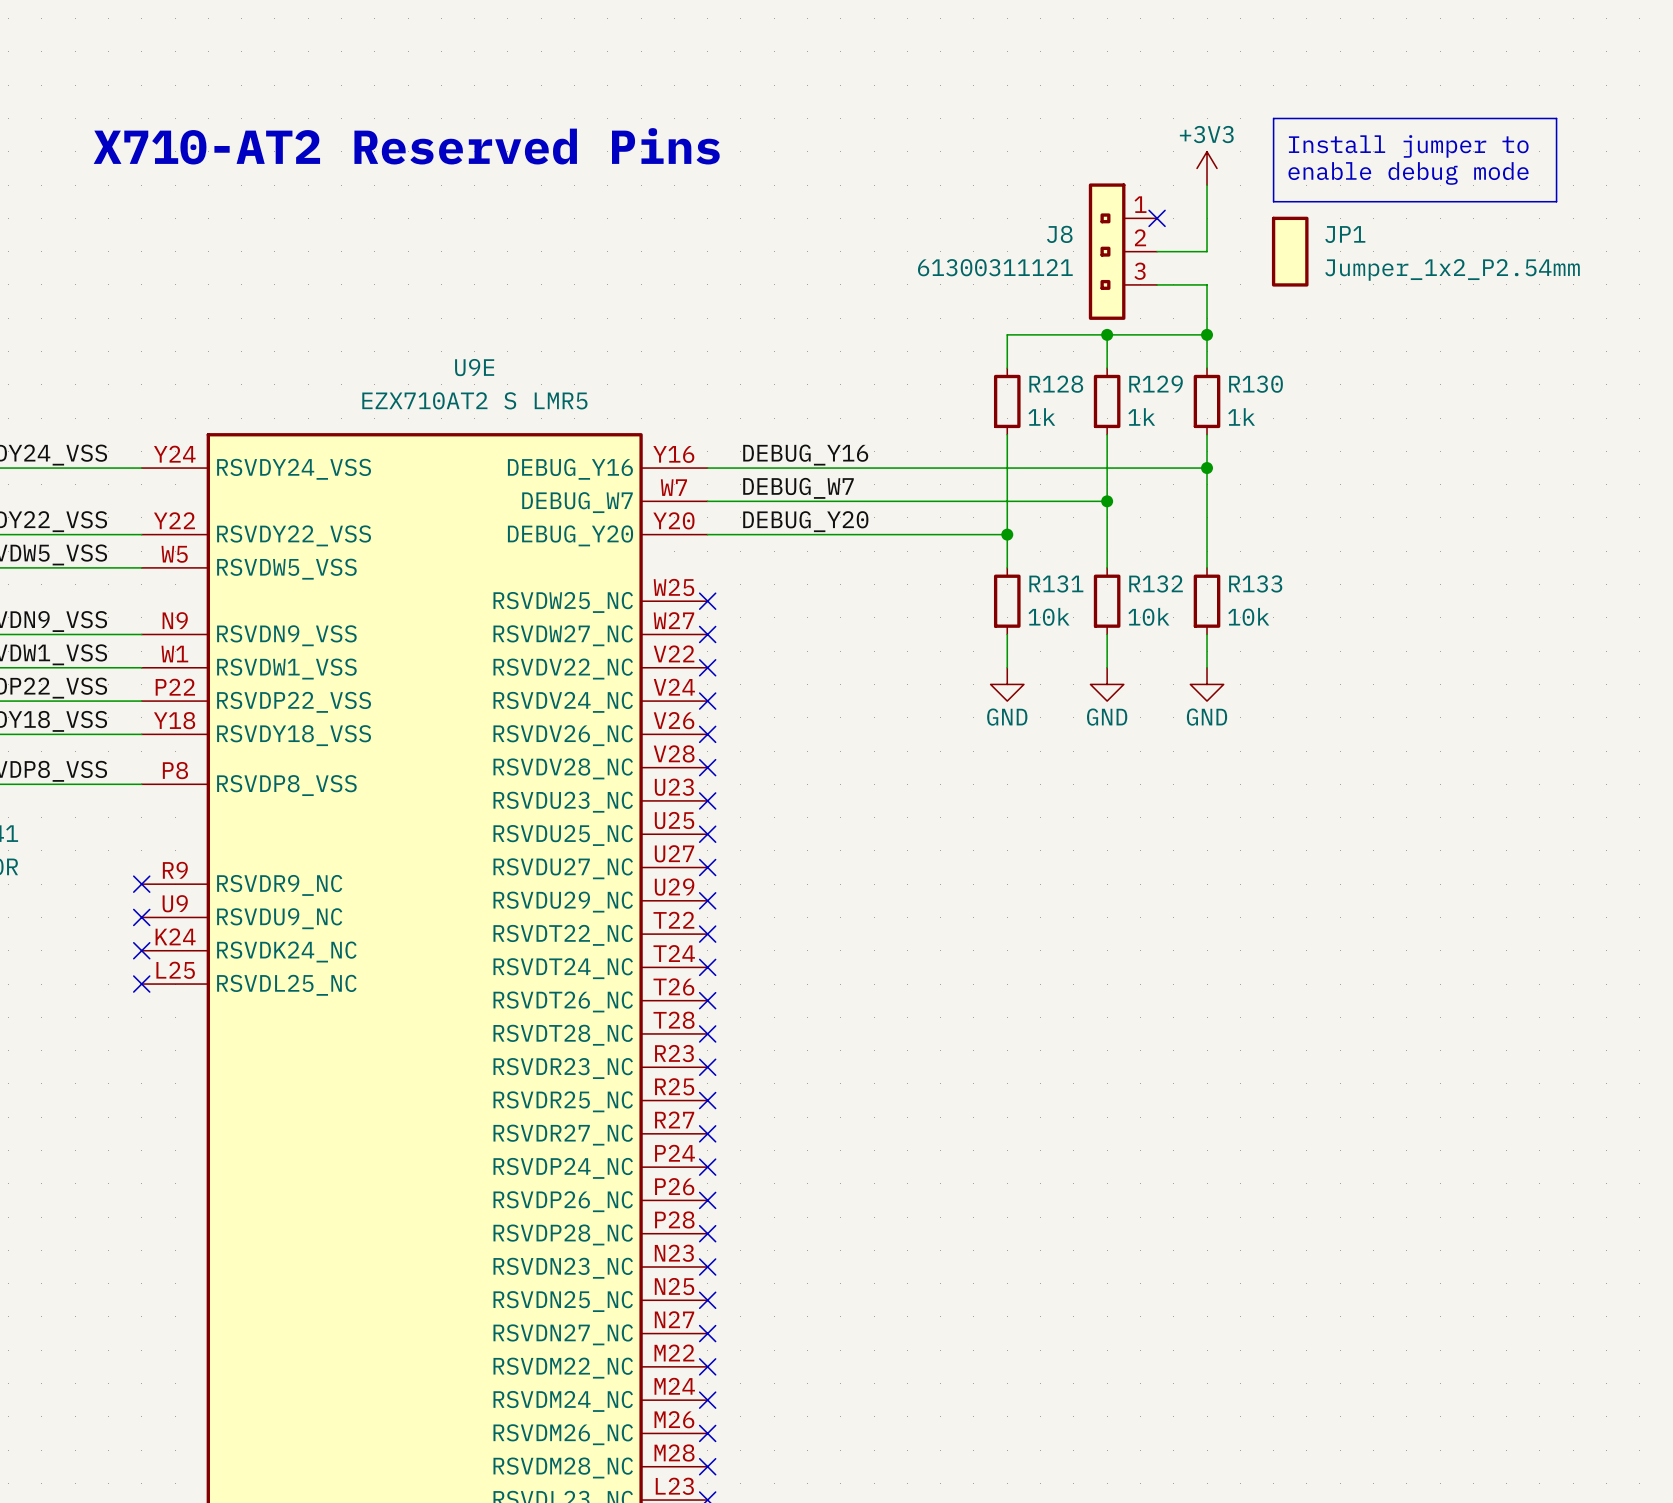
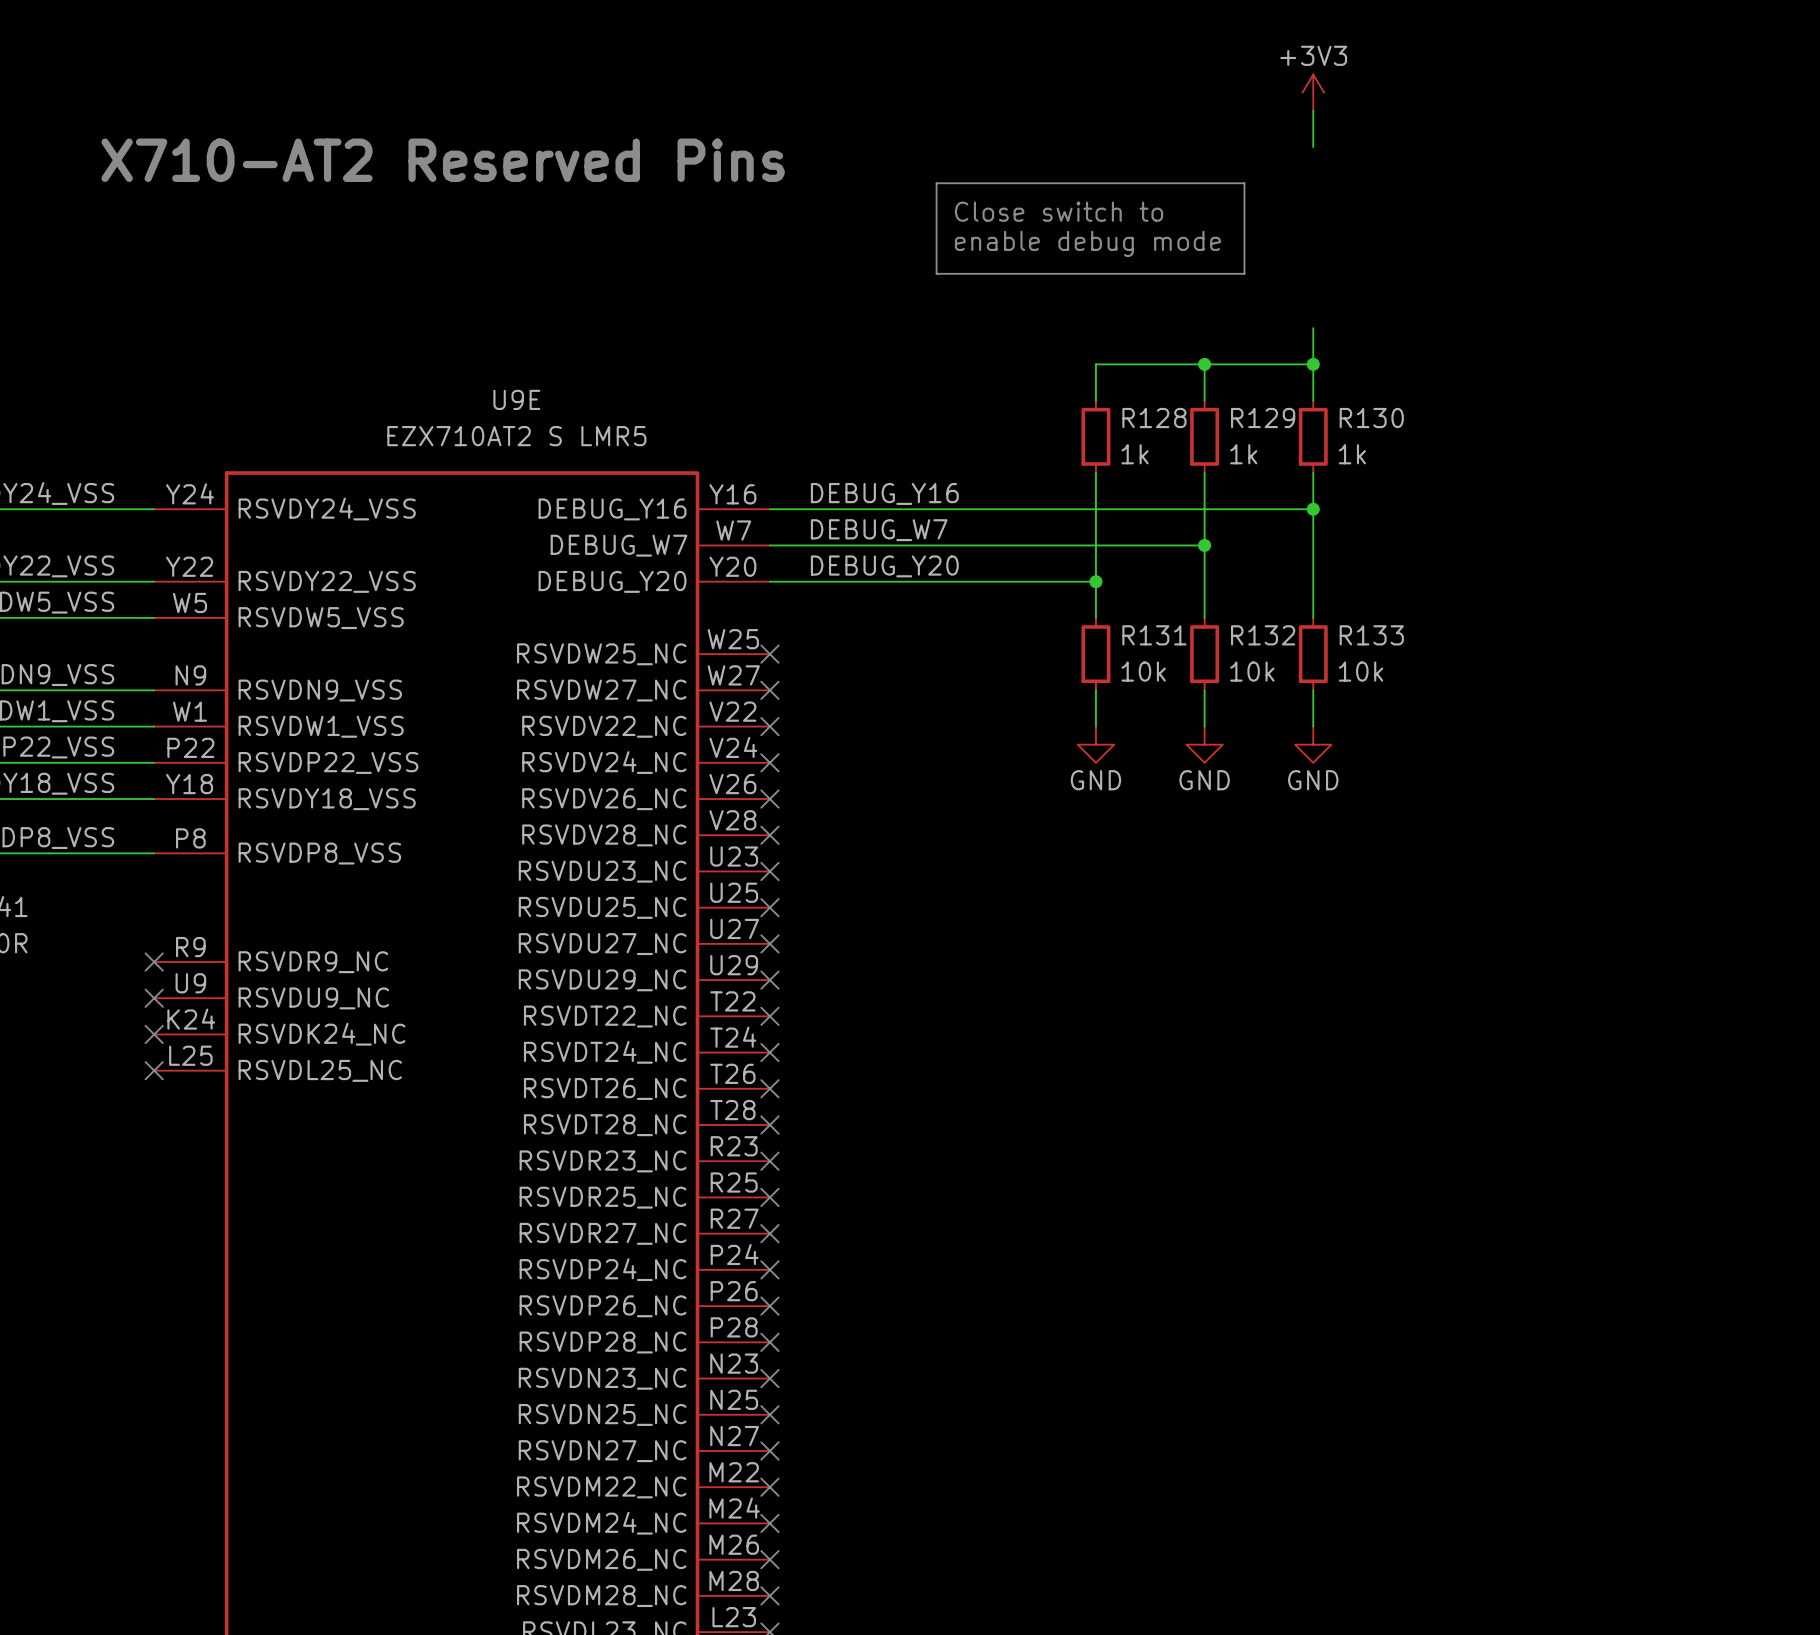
wire: none -> (1313, 110) (1313, 147)
line: (1273, 118) (1556, 118) (1556, 201) (1273, 201) (1273, 118) -> none
text: Install jumper to (1408, 146) -> none
line: none -> (936, 183) (1244, 183) (1244, 273) (936, 273) (936, 183)
power symbol position: +3V3 (1207, 168) -> +3V3 (1313, 92)
text: enable debug mode (1408, 173) -> none
wire: (1207, 185) (1207, 251) (1157, 251) -> none
text: none -> Close switch to (1059, 211)
no-connect mark: (1157, 218) -> none
text: none -> enable debug mode (1087, 243)
J8: (1122, 251) -> none
JP1: Jumper_1x2_P2.54mm (1290, 251) -> none
wire: (1157, 284) (1207, 284) (1207, 301) -> none

